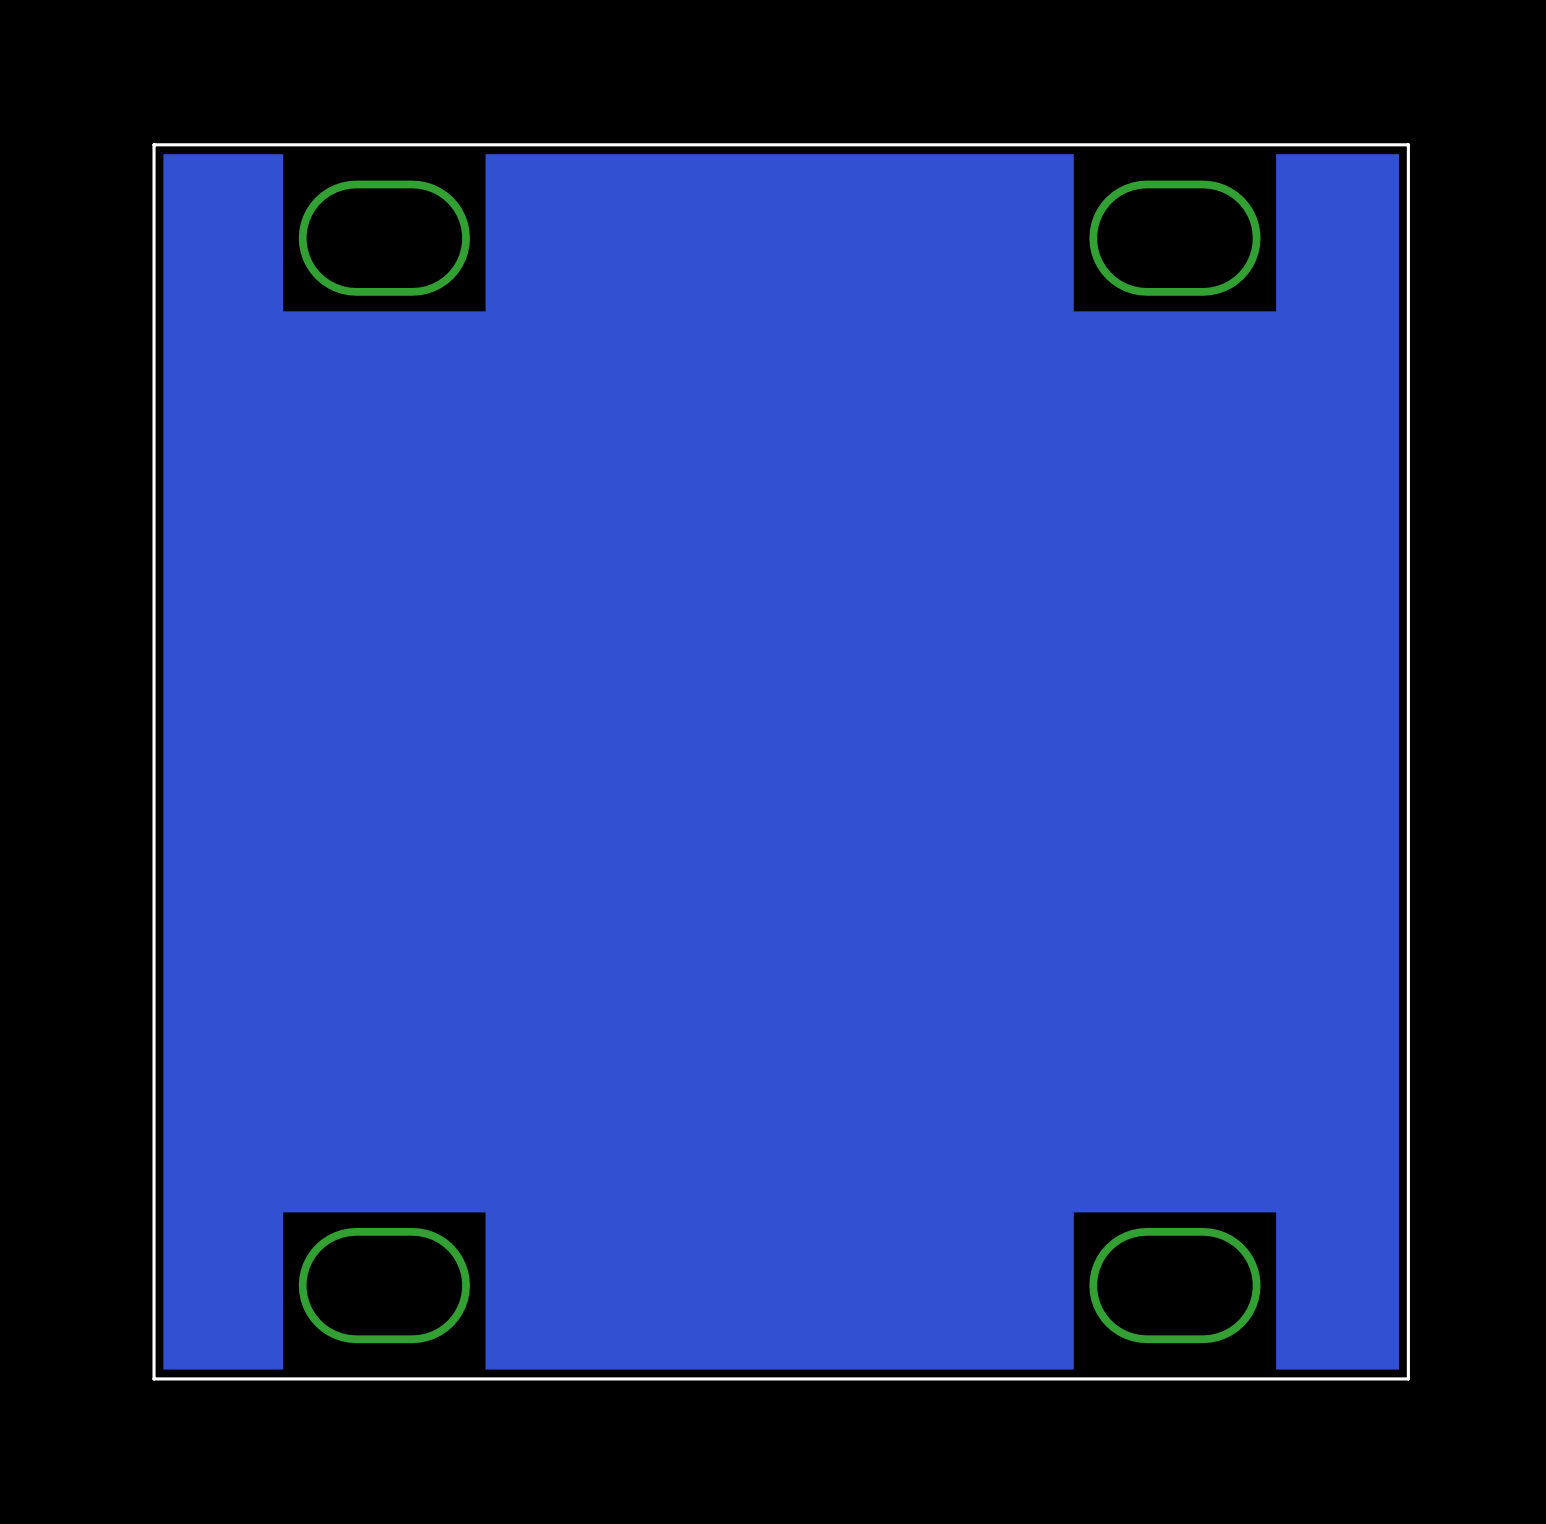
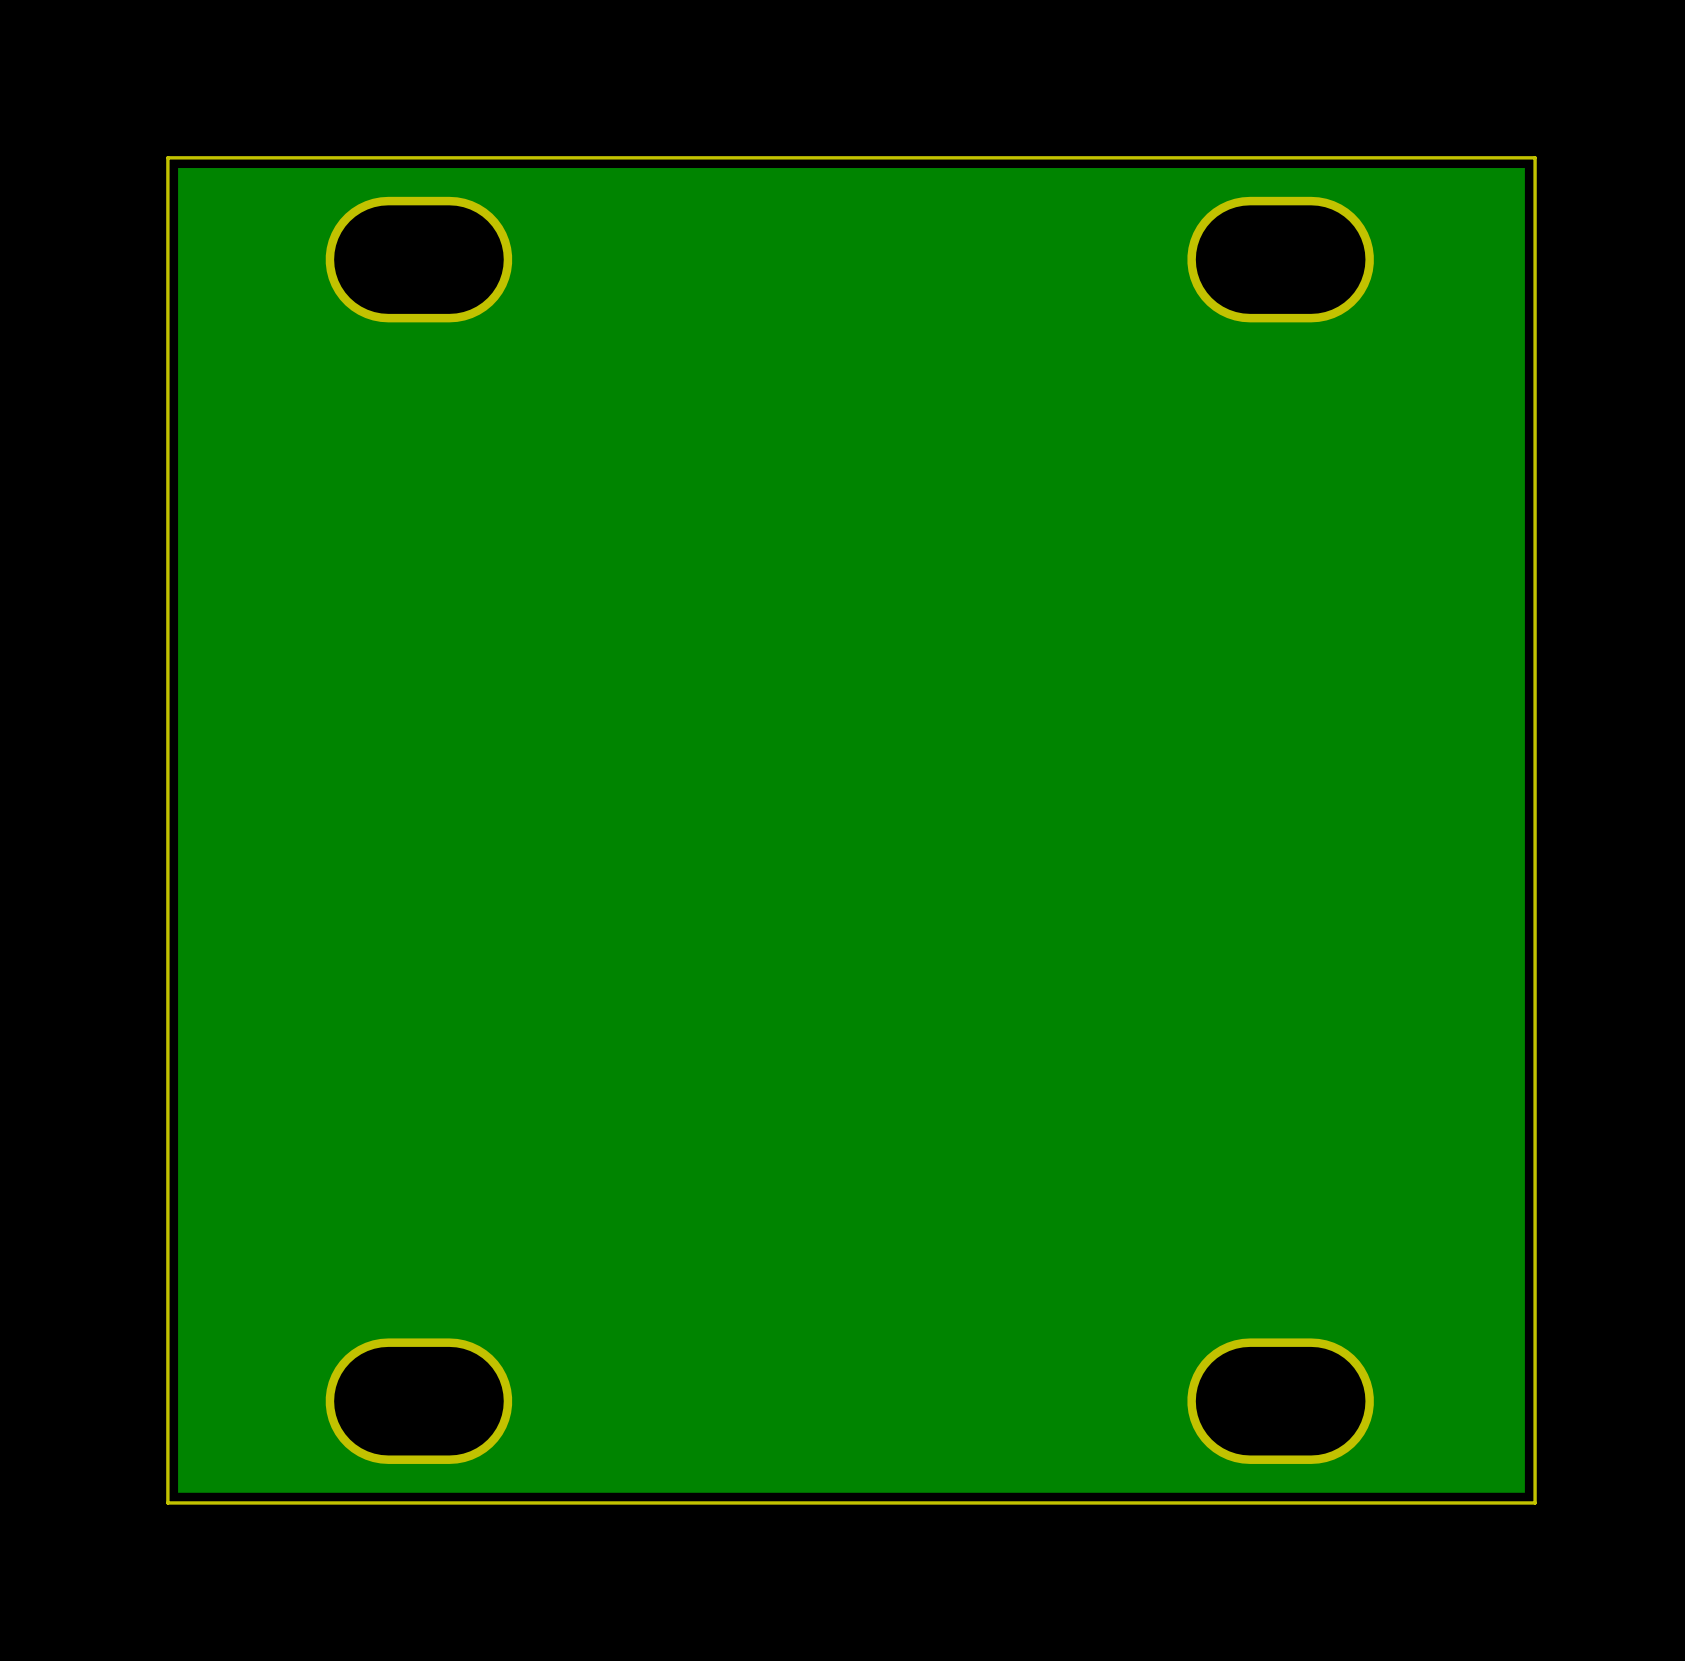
drawing: [163, 154, 284, 1370] -> none
drawing: [485, 154, 1074, 312] -> none
drawing: [1276, 154, 1400, 1370] -> none
drawing shape: [283, 311, 1277, 1213] -> [178, 168, 1525, 1493]
drawing: [485, 1212, 1074, 1370] -> none

